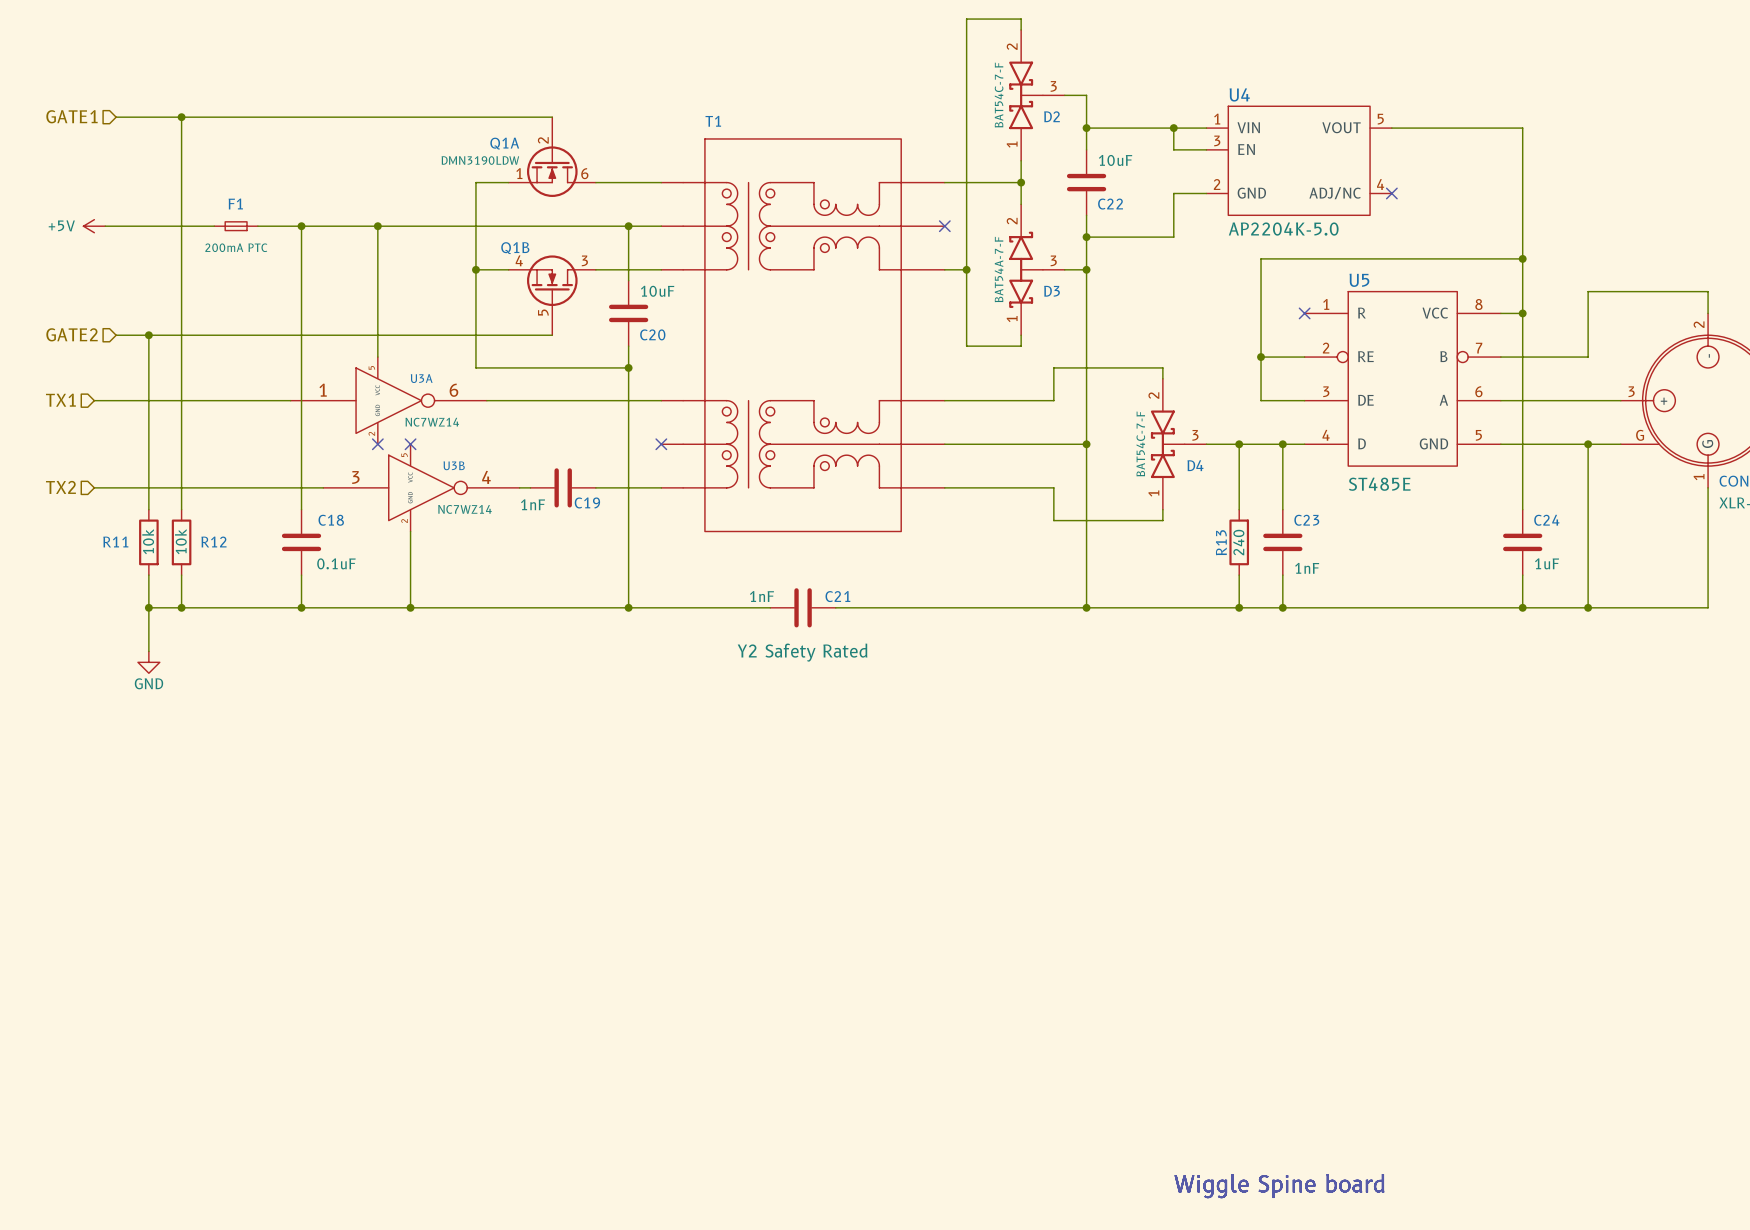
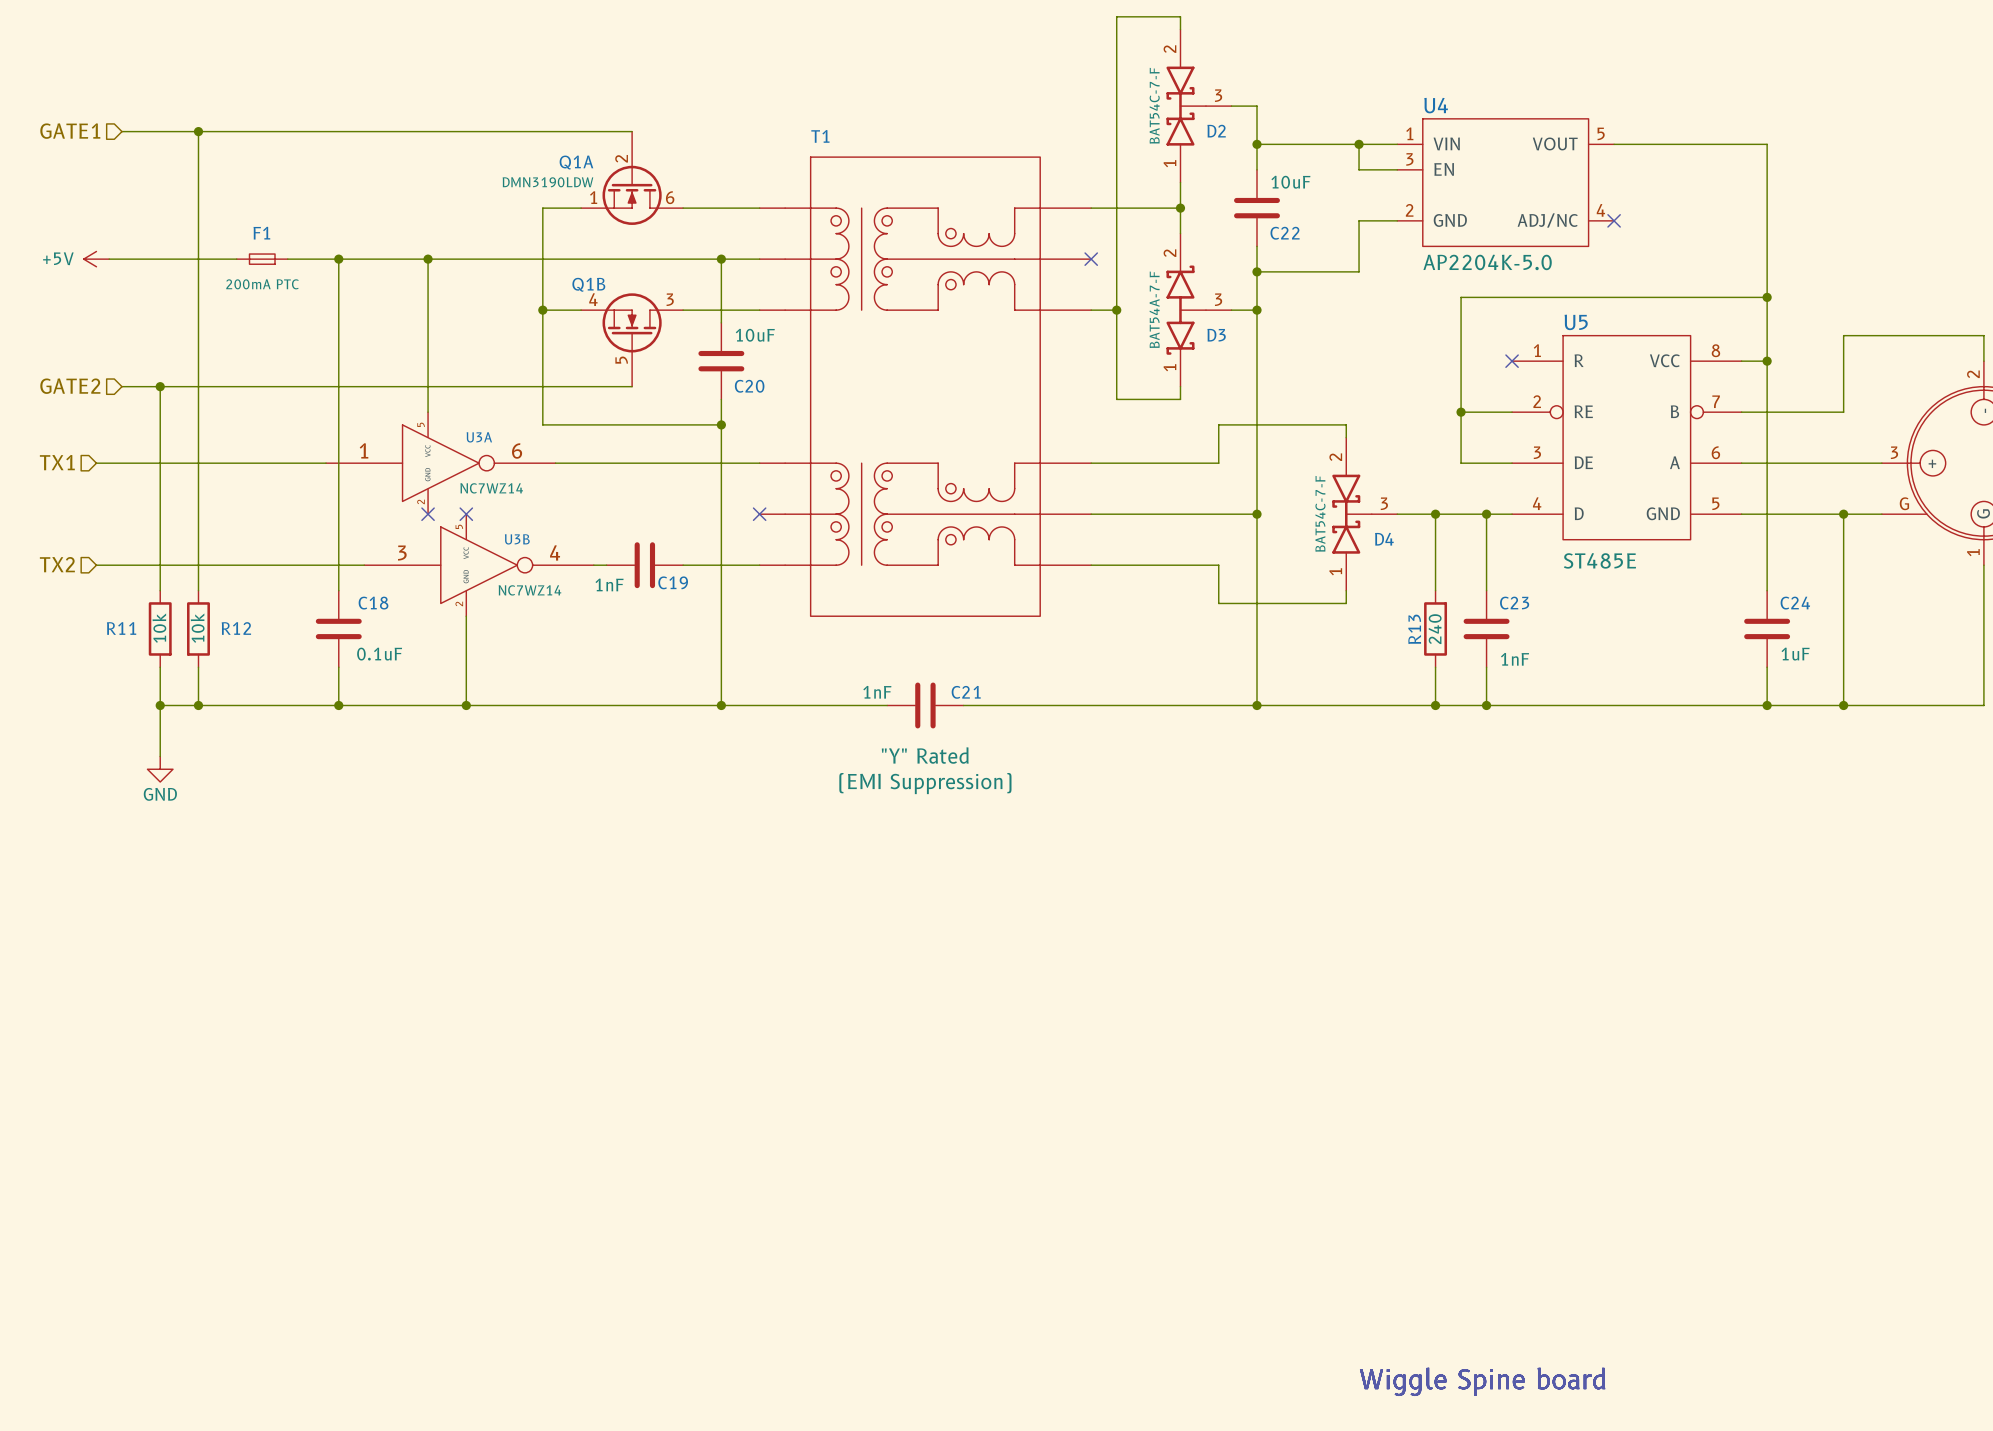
C21 text: Y2 Safety Rated (802, 652) -> "Y" Rated (925, 755)
C21 text: none -> (EMI Suppression) (925, 783)

